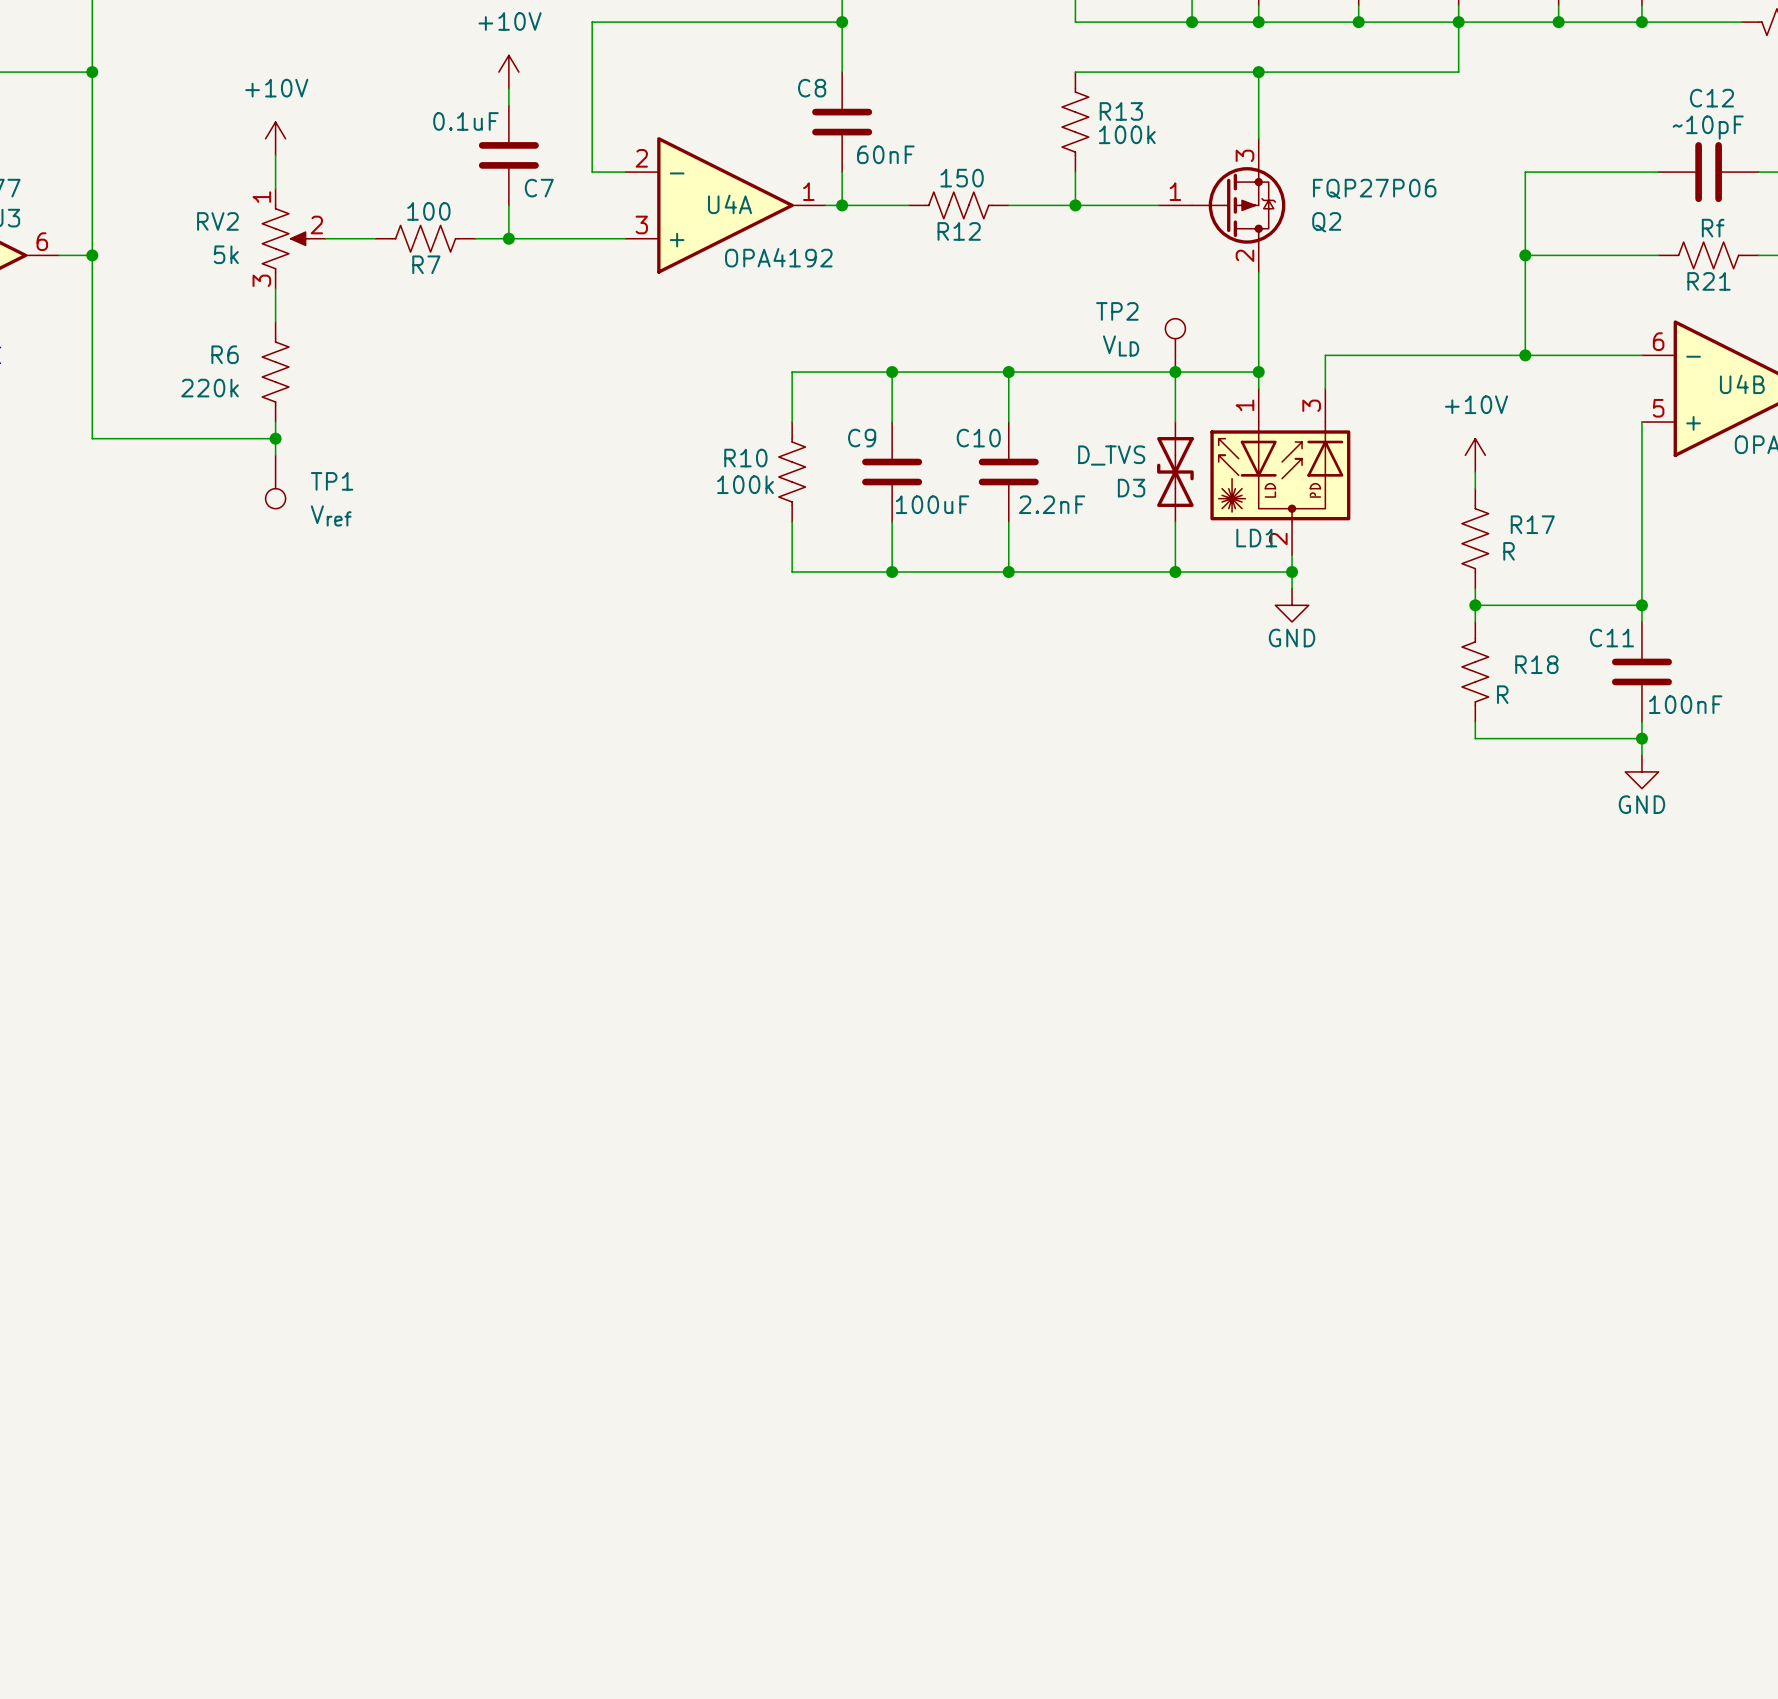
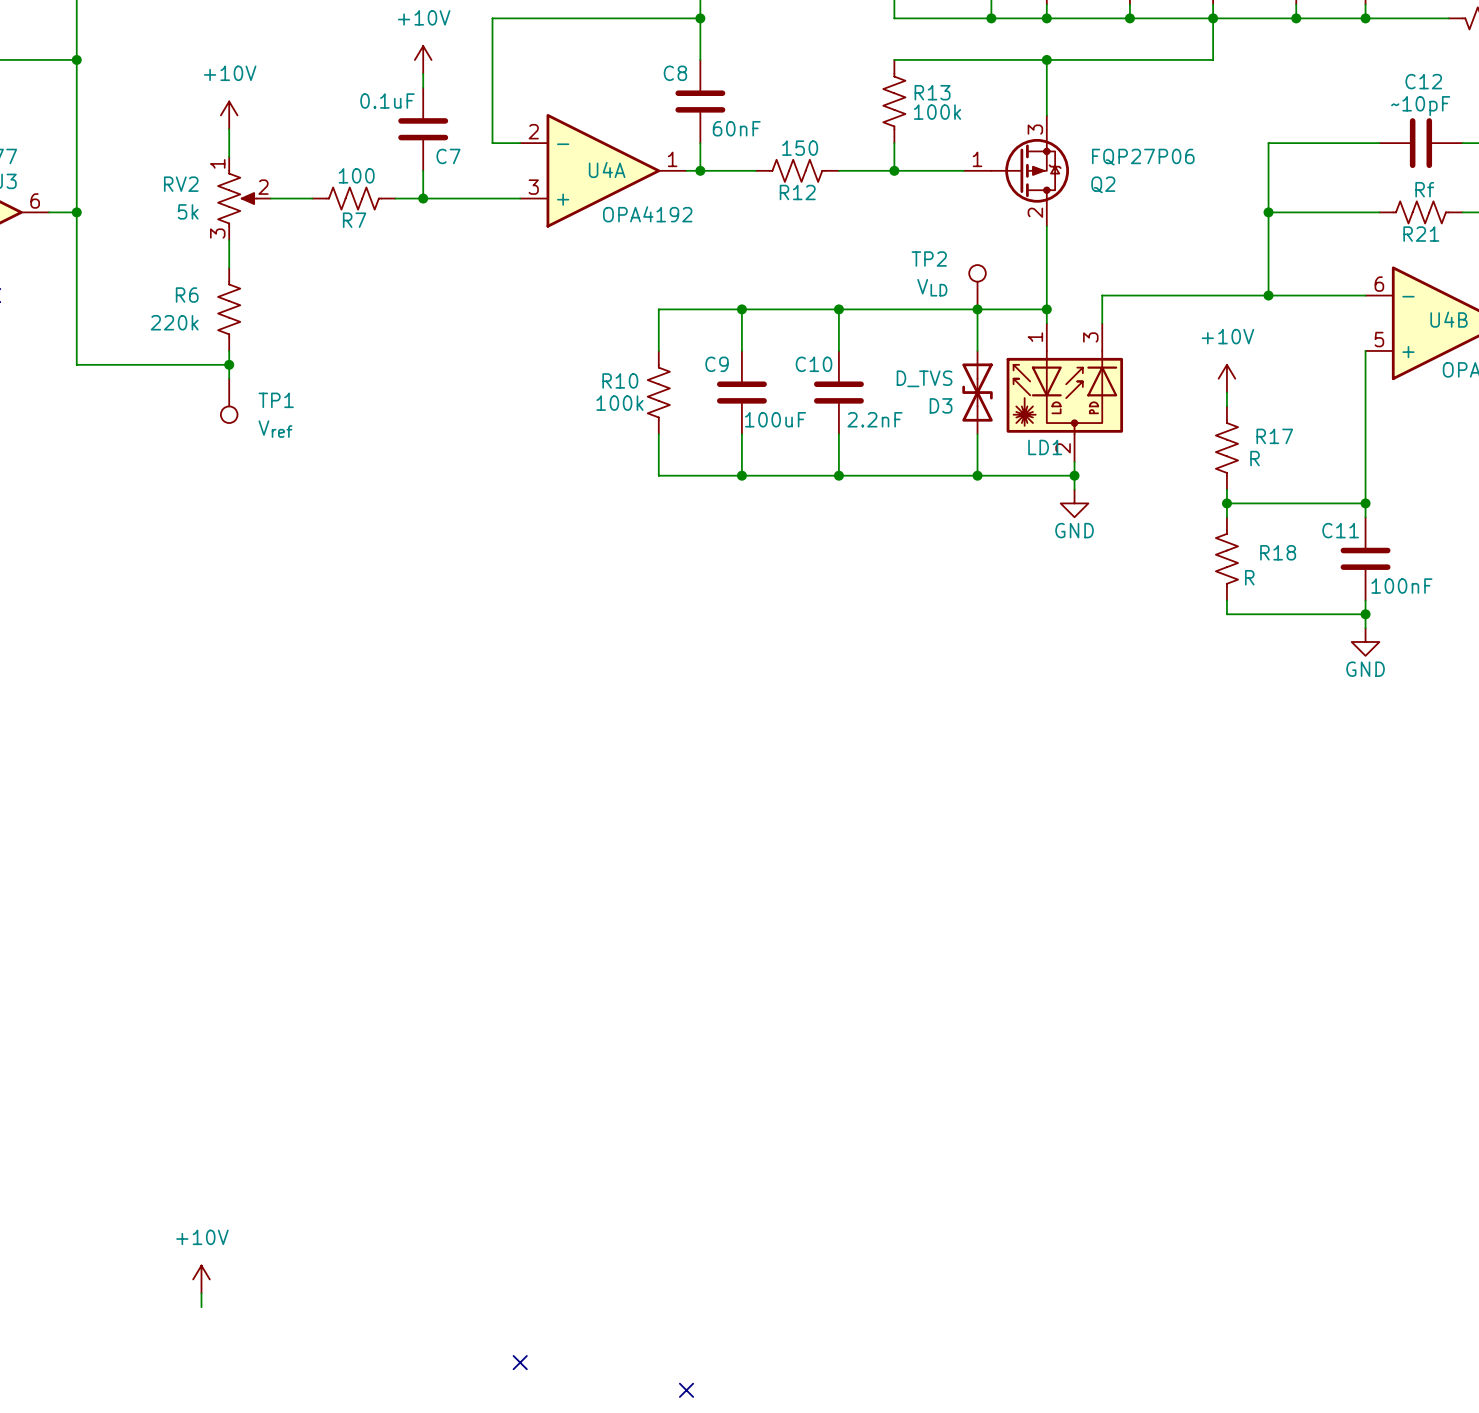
power symbol: none -> +10V (201, 1279)
wire: none -> (201, 1293) (201, 1307)
no-connect mark: none -> (520, 1362)
no-connect mark: none -> (686, 1390)

